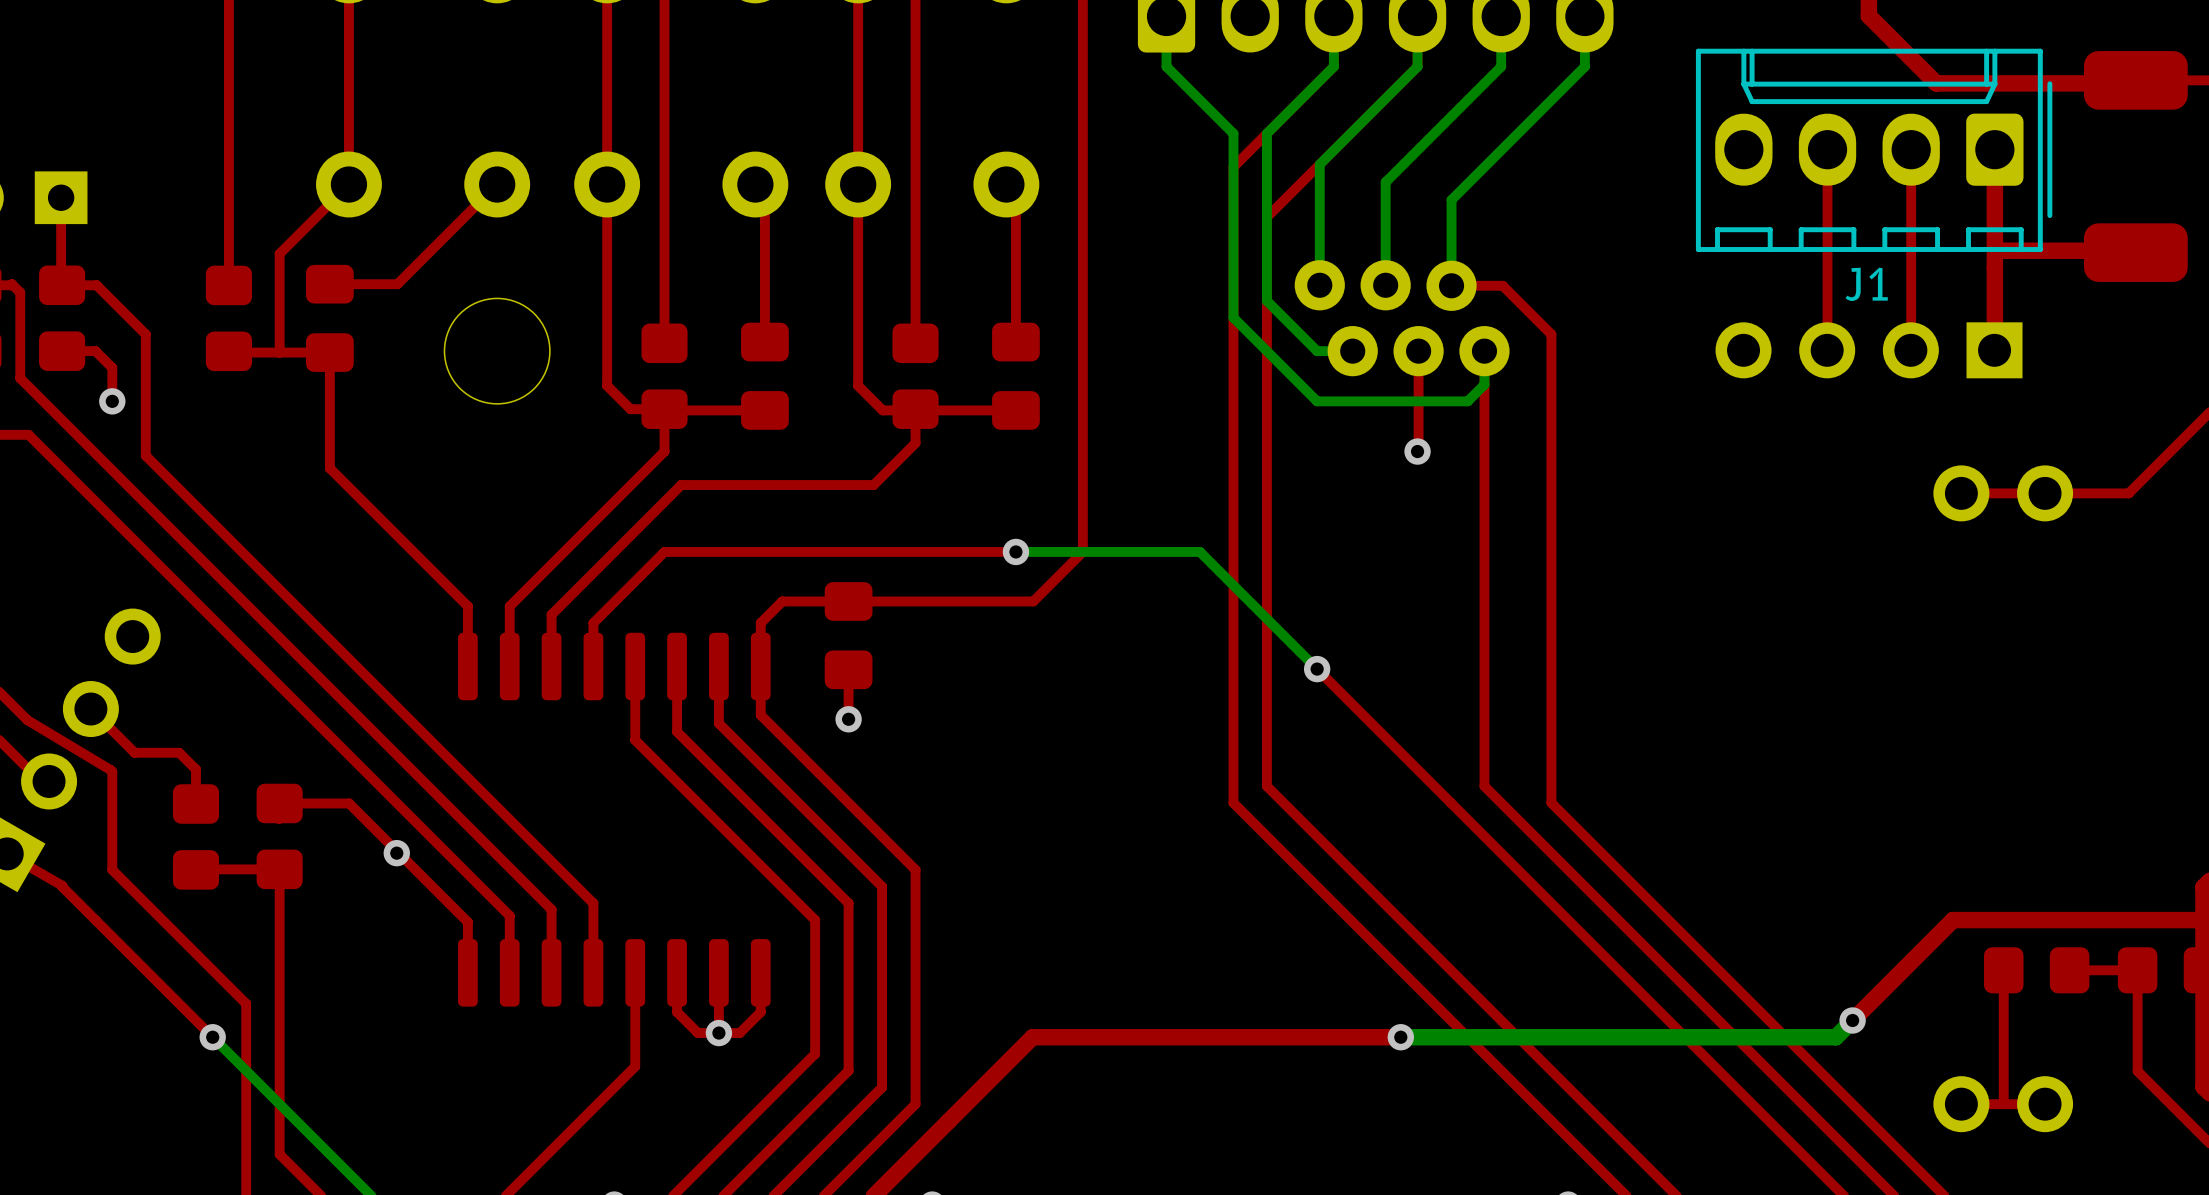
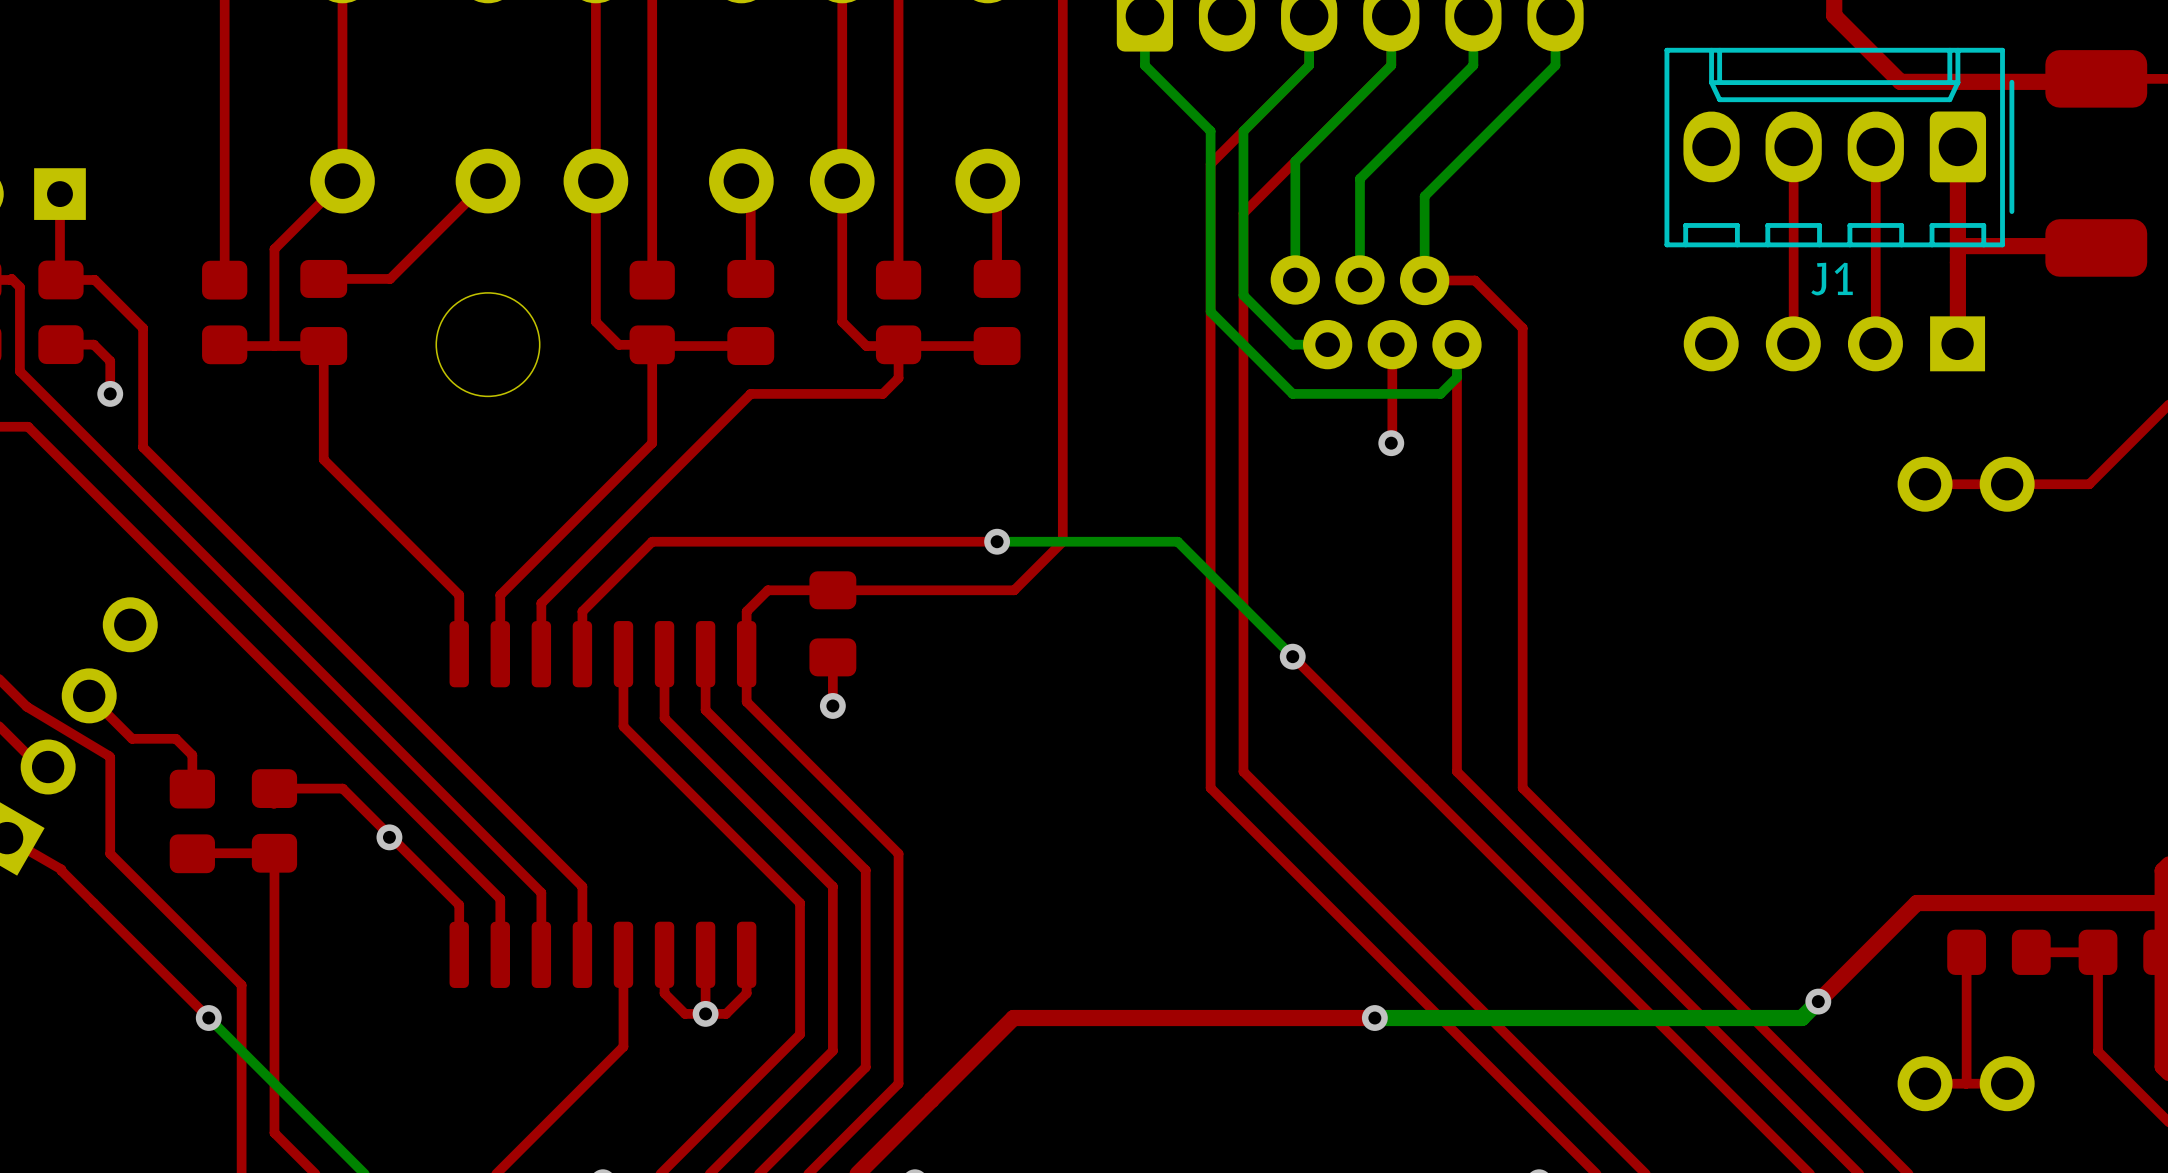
top track: (764, 284) (764, 342) -> none
top track: (1015, 284) (1015, 342) -> none
top track: (664, 285) (664, 343) -> (652, 344) (652, 401)
top track: (915, 285) (915, 343) -> none
top track: (607, 327) (607, 385) (630, 409) (764, 410) -> (595, 321) (618, 344) (750, 346)
top track: (858, 327) (858, 385) (882, 410) (999, 410) -> (842, 321) (866, 346) (980, 346)
part position: (664, 376) -> (652, 312)
part position: (764, 376) -> (750, 312)
part position: (915, 376) -> (898, 312)
part position: (1015, 376) -> (997, 312)
top track: (915, 409) (915, 443) (873, 485) (681, 485) -> (898, 344) (898, 378) (882, 393) (750, 393) (668, 476)

